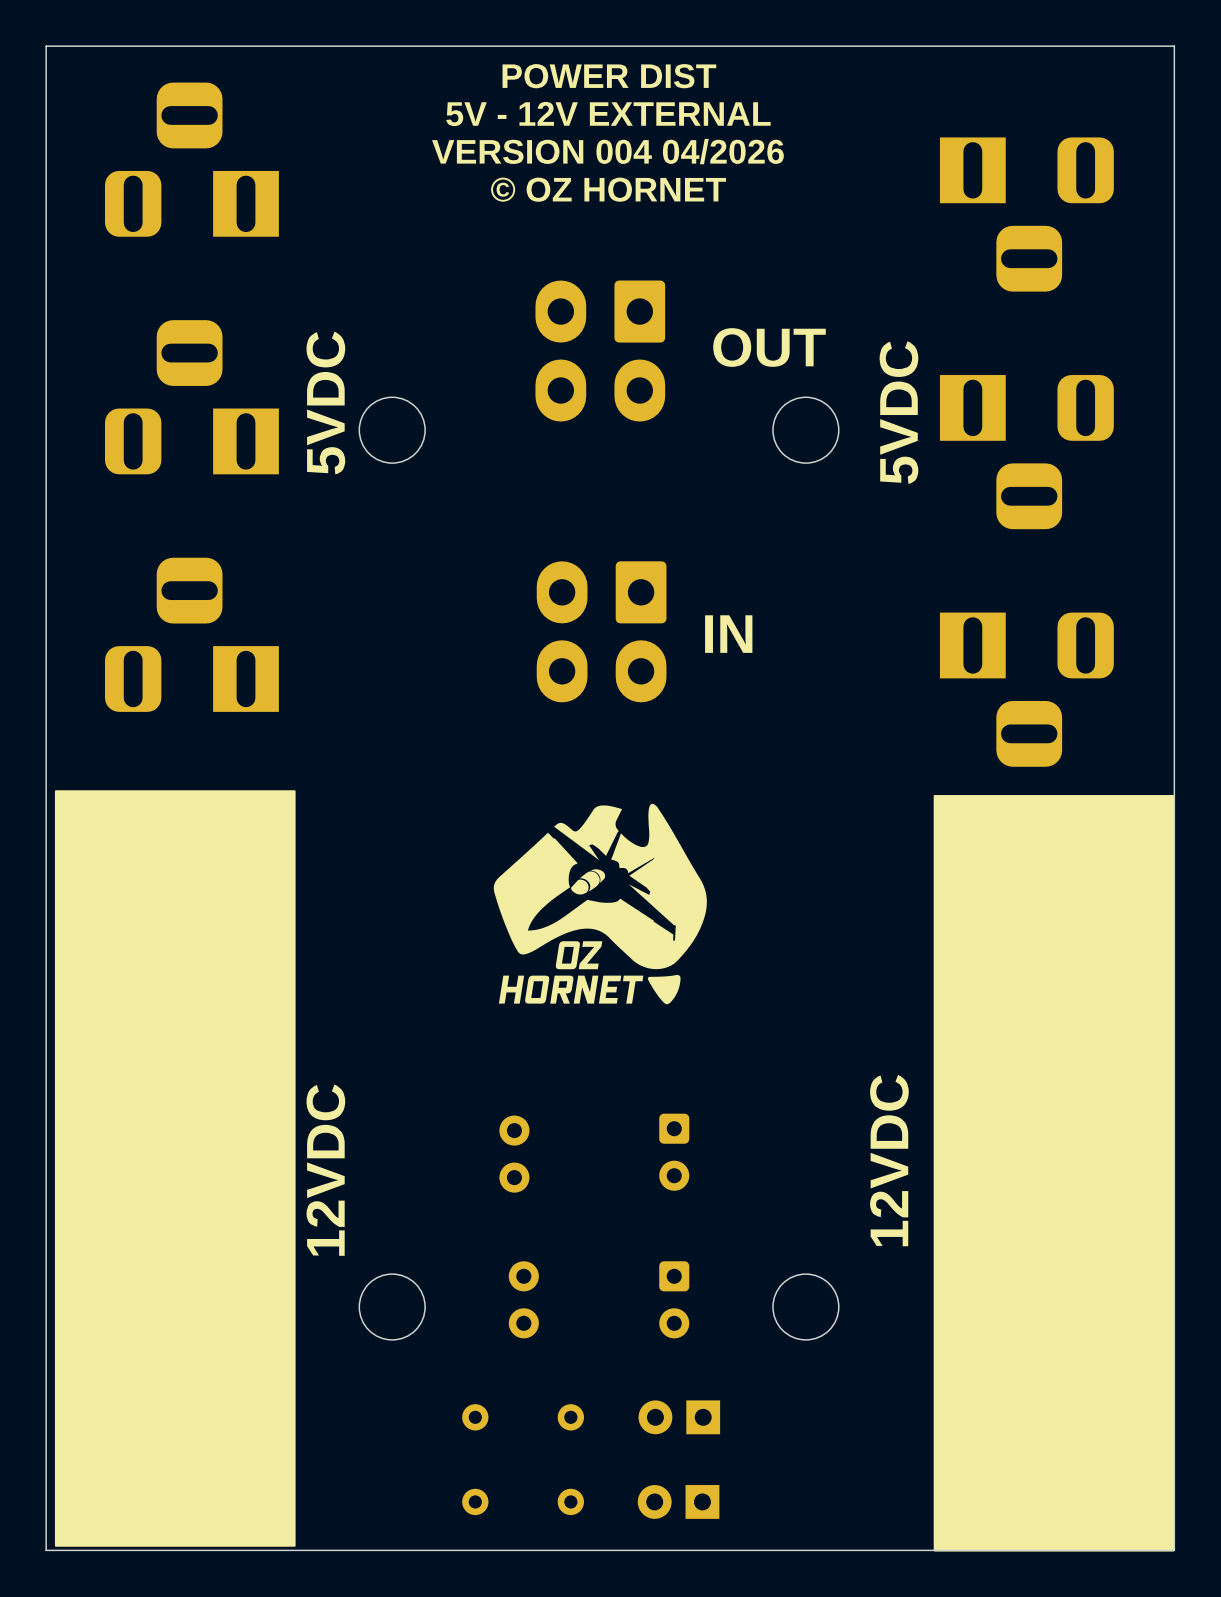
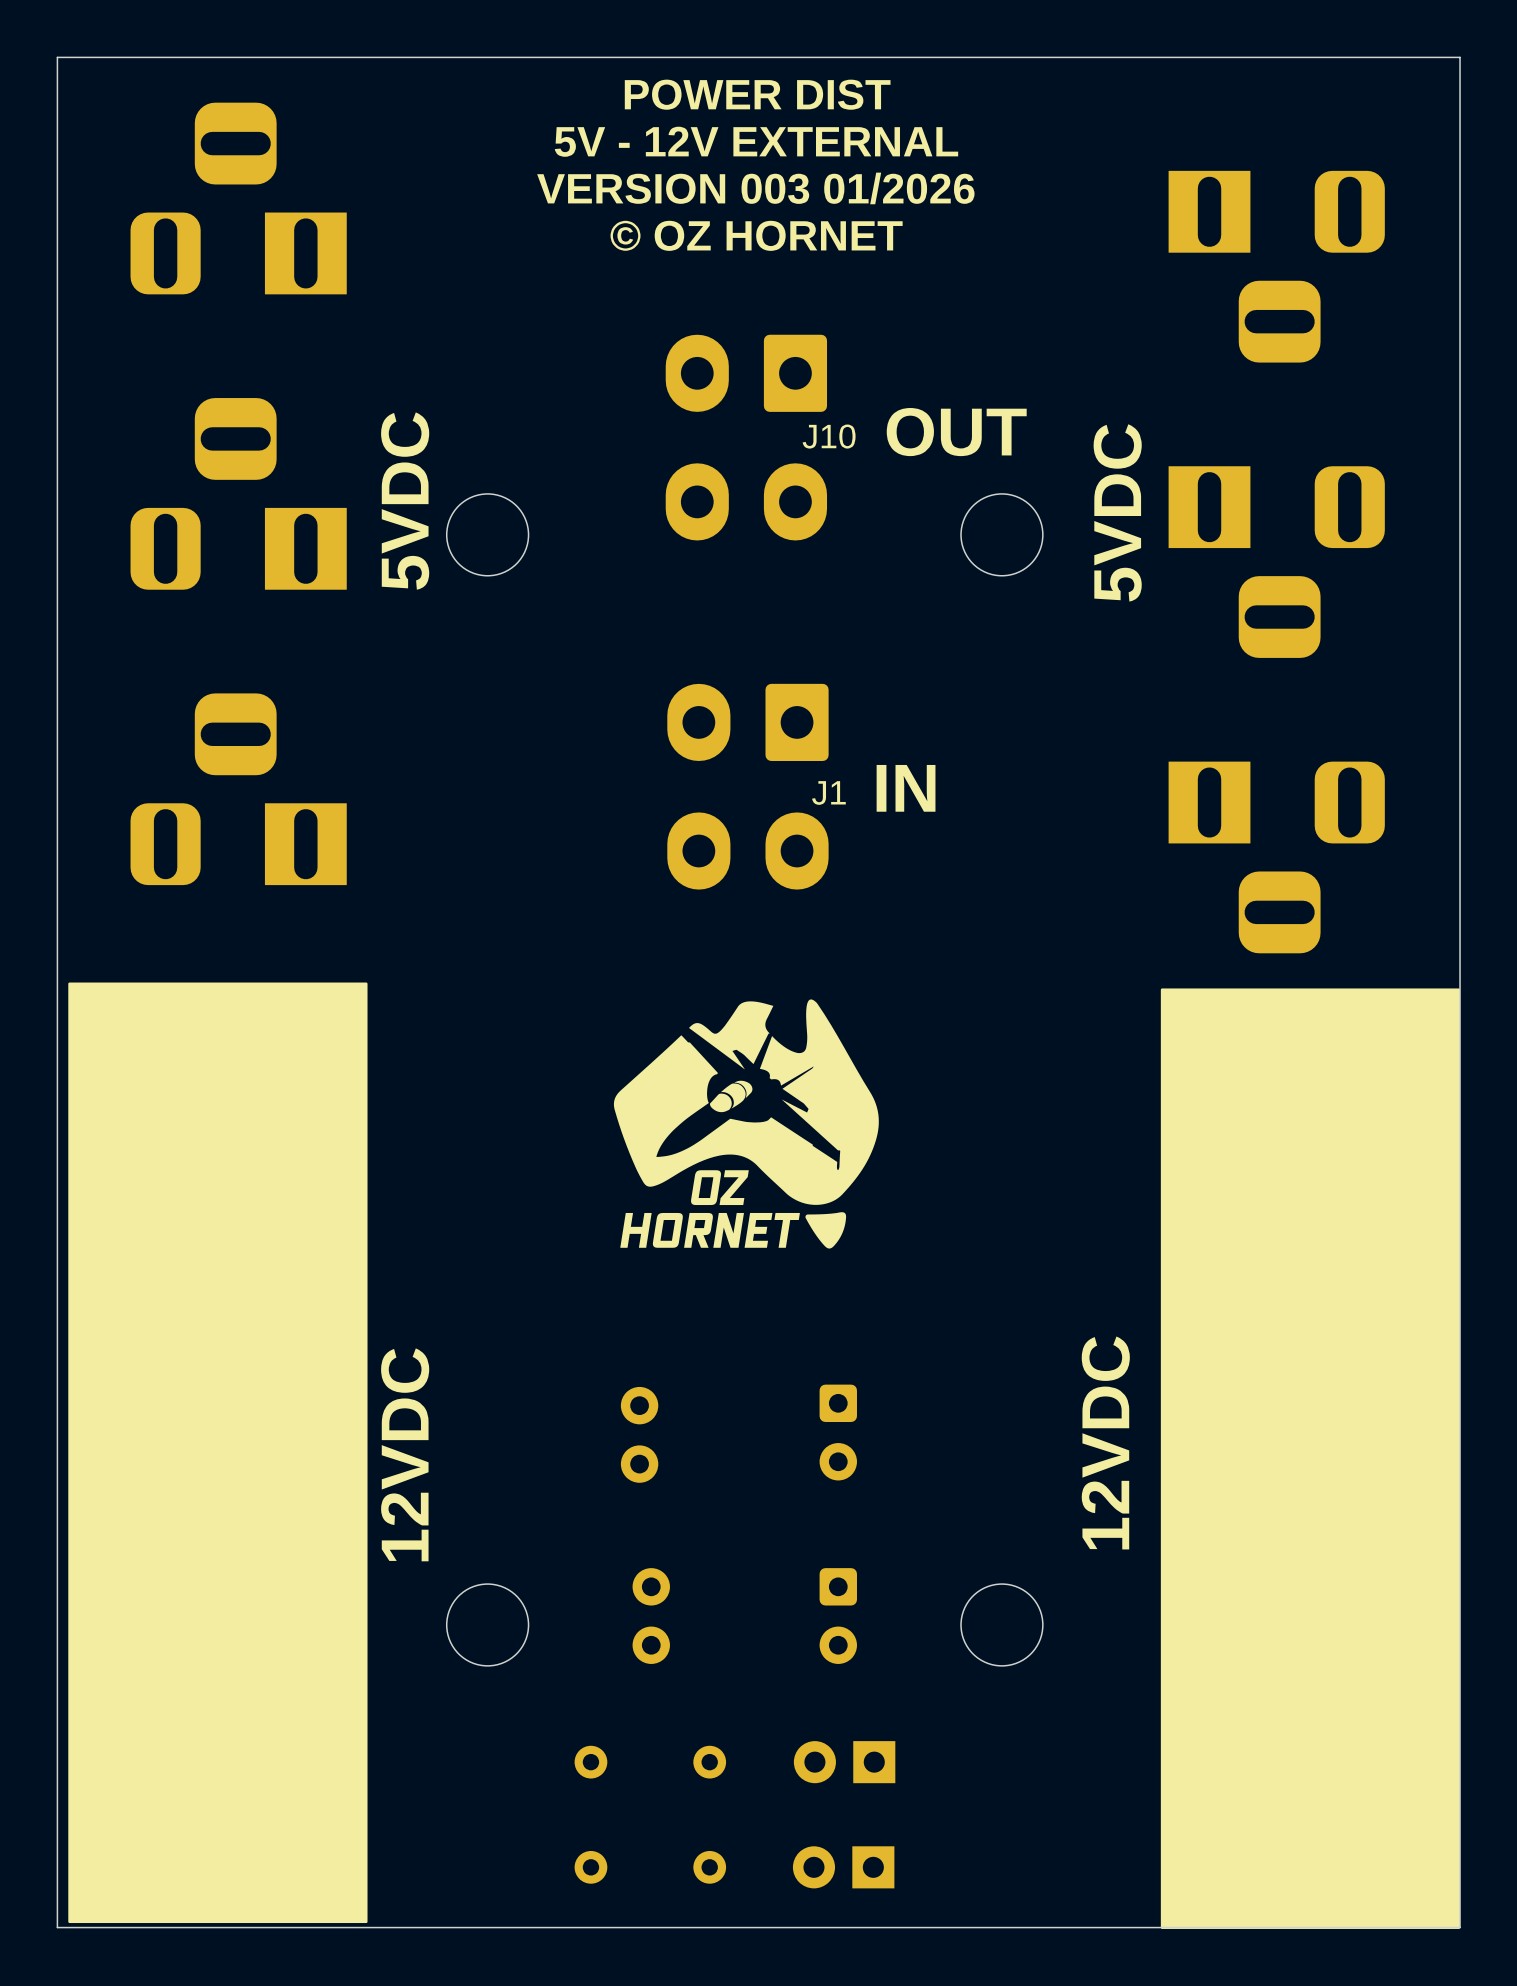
text: VERSION 004 04/2026 (607, 151) -> VERSION 003 01/2026 (755, 188)
part: (600, 351) -> none
J10: none -> (746, 437)
part: (601, 631) -> none
J1: none -> (747, 786)

